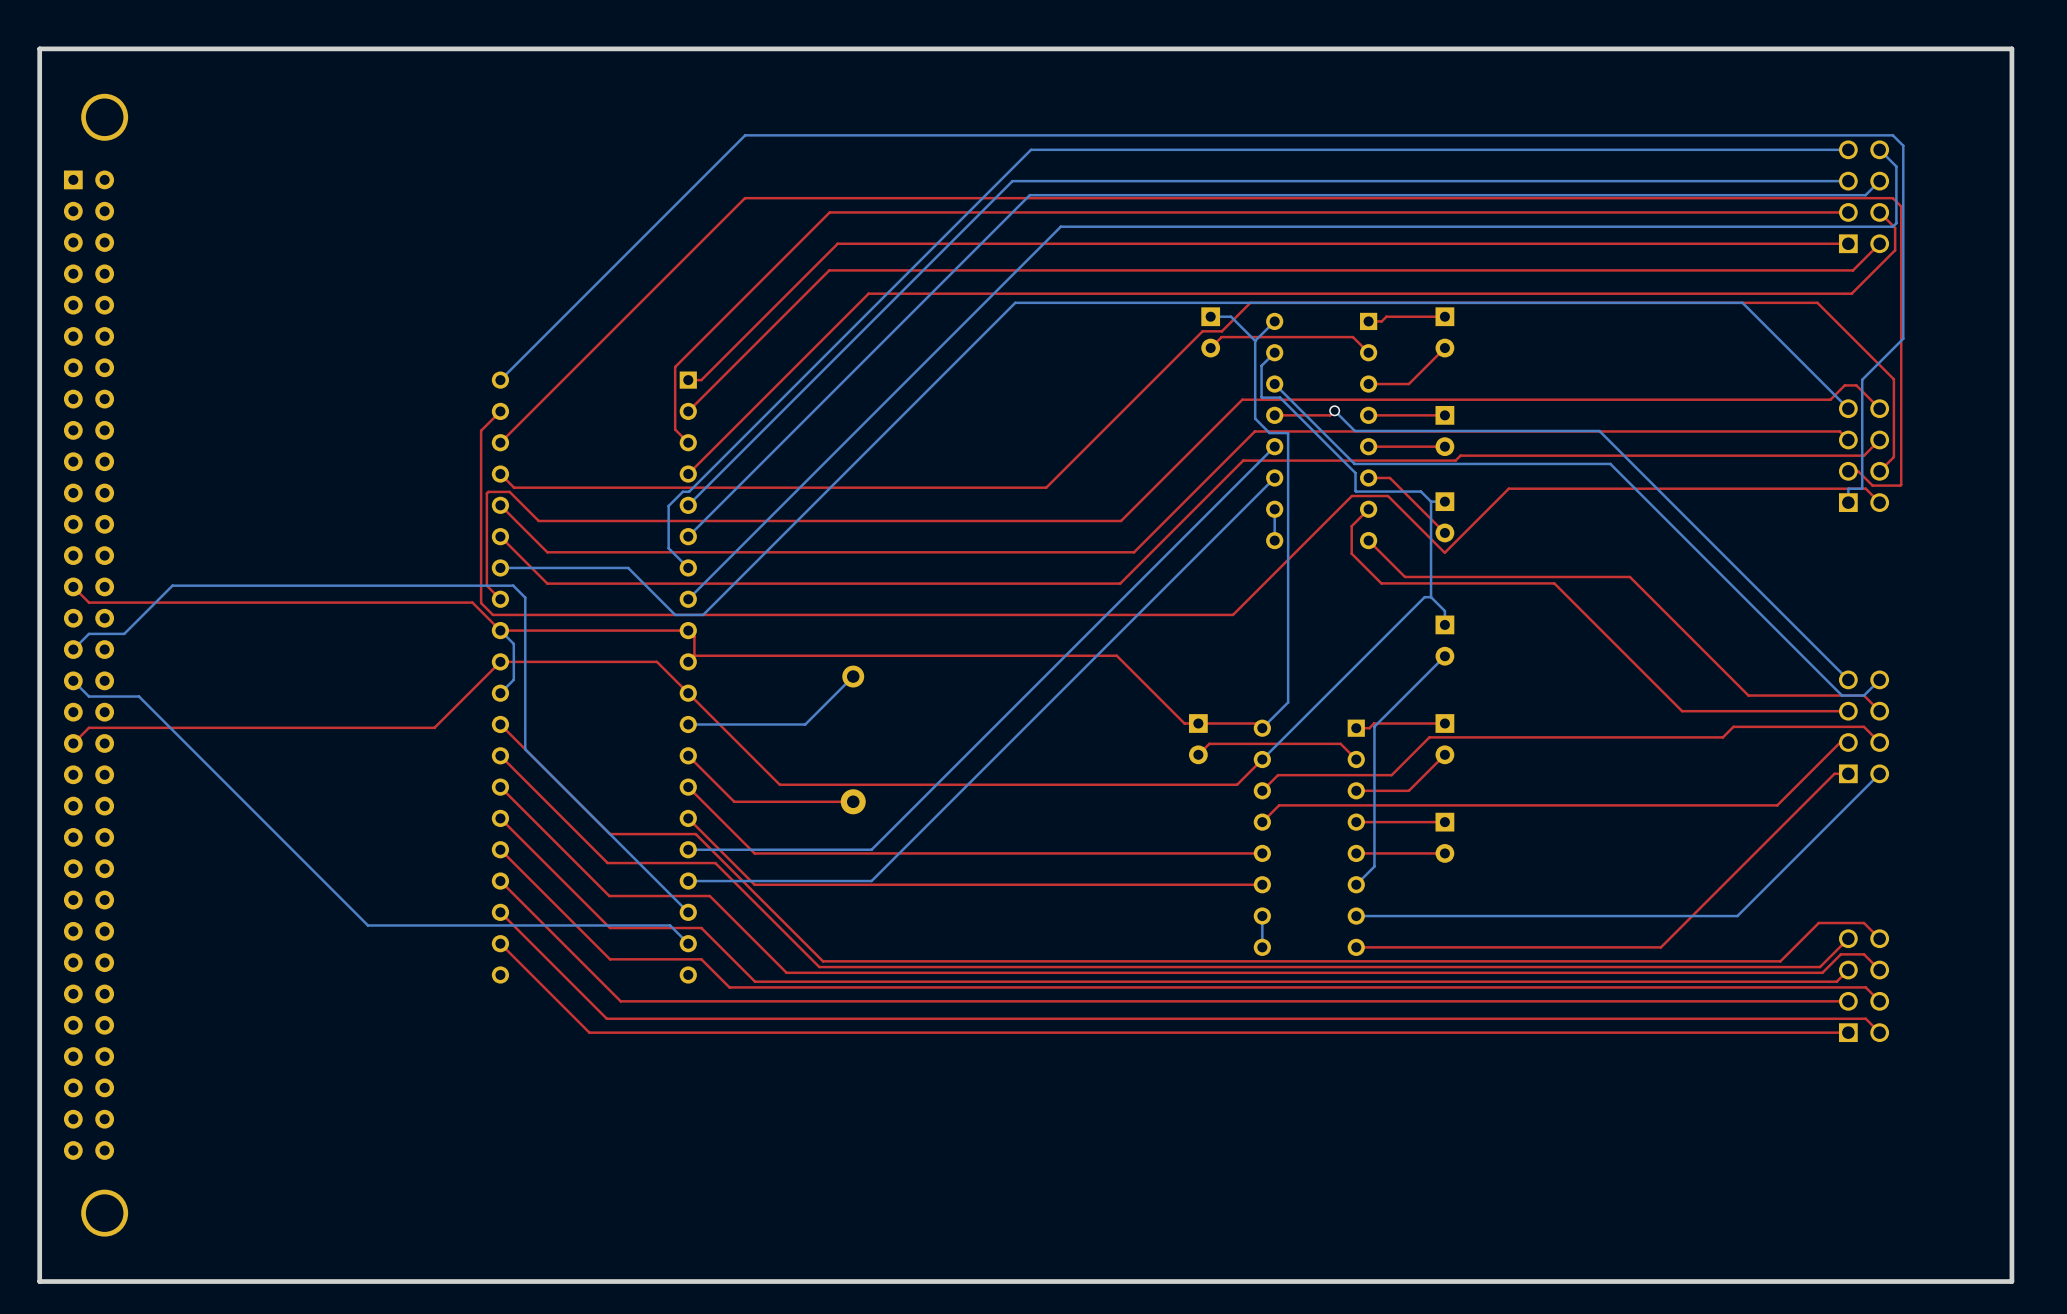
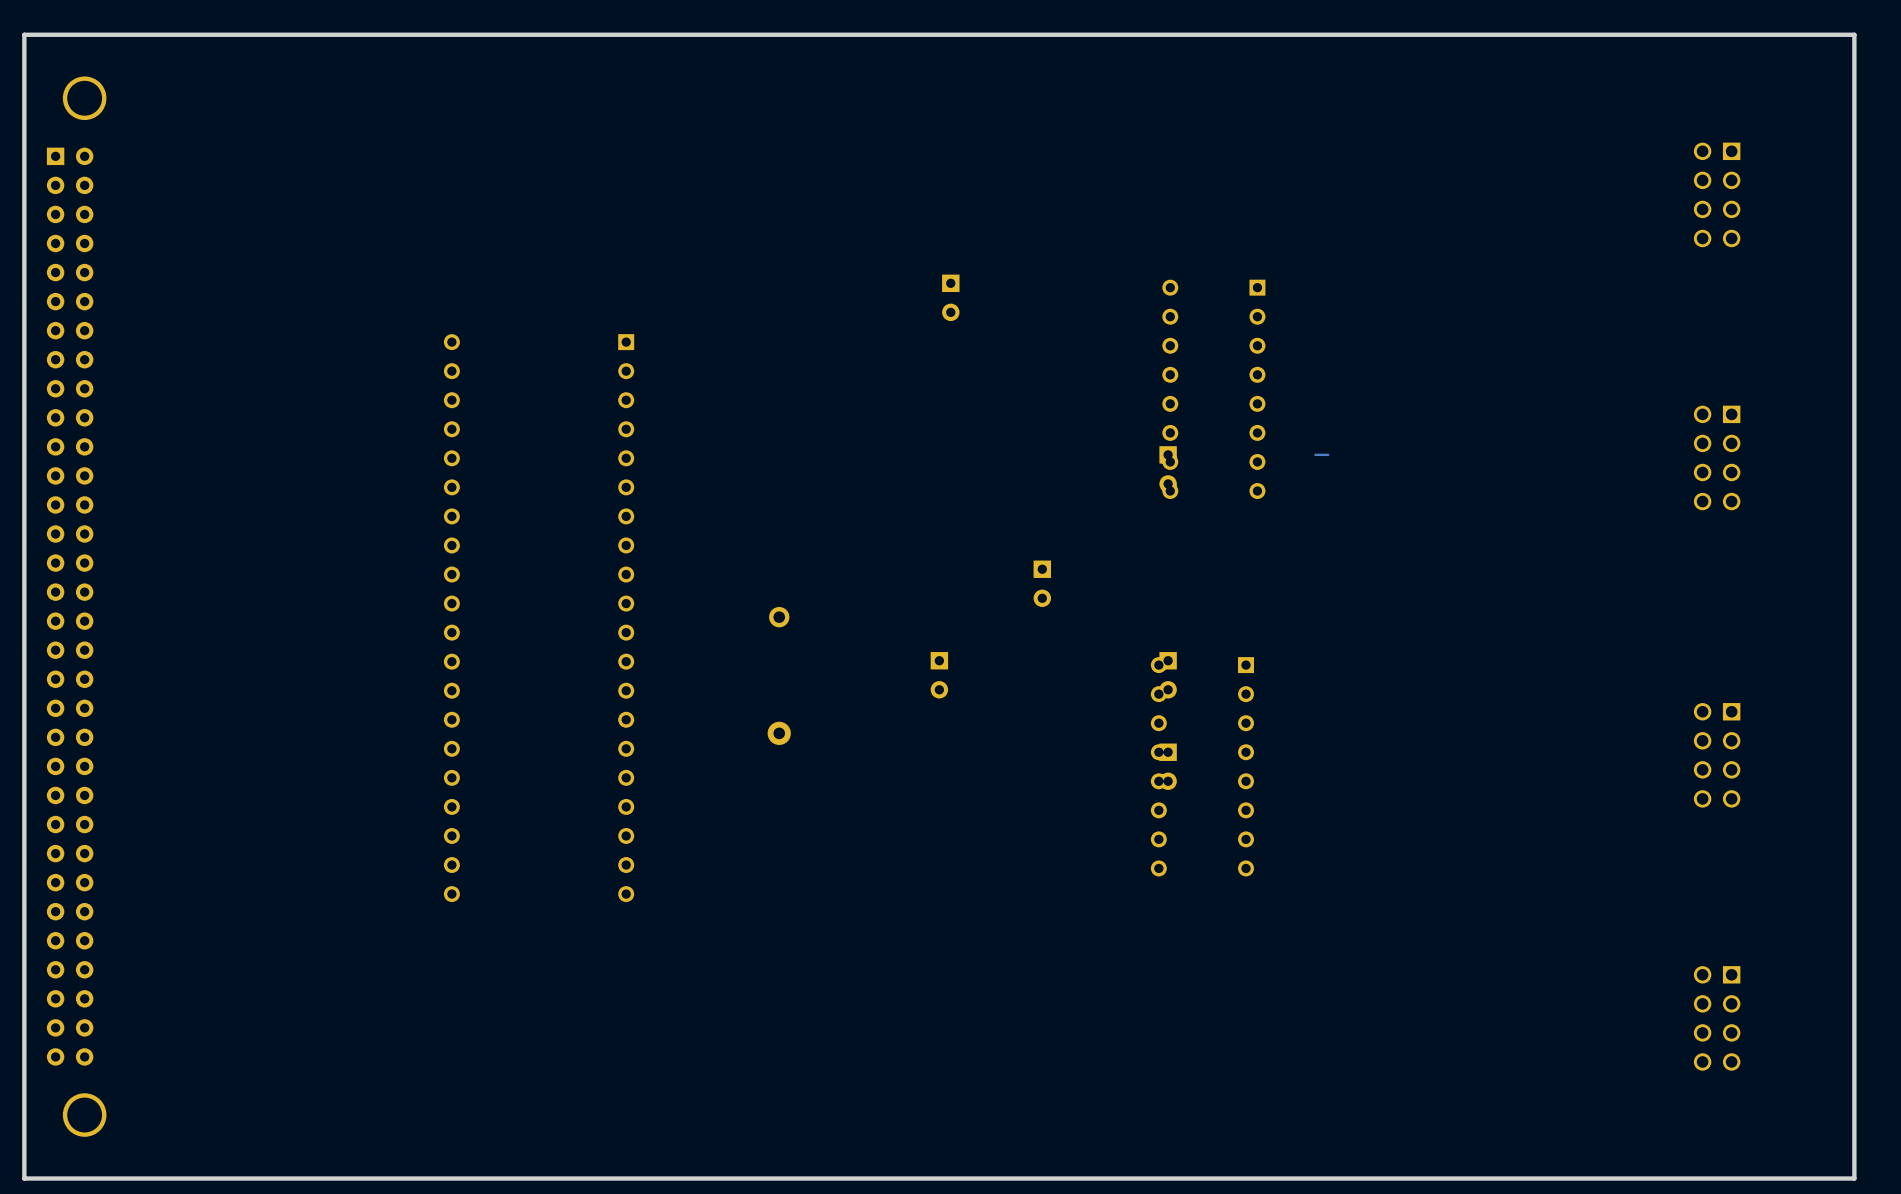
bottom track: (1848, 149) (1031, 149) (689, 491) (682, 491) (668, 506) (668, 548) (688, 567) -> none
bottom track: (1879, 149) (1896, 166) (1896, 223) (1892, 226) (1060, 226) (688, 599) -> none
bottom track: (1848, 181) (1012, 181) (688, 505) -> none
bottom track: (1879, 181) (1865, 195) (1029, 195) (688, 536) -> none
part rotation: 0° (1864, 196) -> 180° (1717, 194)
top track: (1848, 212) (829, 212) (675, 366) (675, 429) (688, 442) -> none
top track: (1879, 212) (1895, 227) (1895, 250) (1851, 293) (868, 293) (688, 474) -> none
top track: (1848, 243) (837, 243) (701, 380) (688, 380) -> none
top track: (1879, 243) (1853, 270) (829, 270) (688, 411) -> none
bottom track: (1210, 316) (1231, 316) (1255, 340) -> none
top track: (1444, 316) (1386, 316) (1381, 321) (1368, 321) -> none
bottom track: (1274, 321) (1255, 340) -> none
part: none -> (950, 297)
part: (1210, 332) -> none
part: (1444, 332) -> none
bottom track: (1255, 340) (1255, 418) (1269, 433) (1288, 433) (1288, 702) (1262, 728) -> none
top track: (1210, 348) (1221, 337) (1352, 337) (1368, 352) -> none
top track: (1444, 348) (1408, 384) (1368, 384) -> none
bottom track: (1274, 352) (1261, 365) (1261, 396) (1280, 397) (1355, 473) (1356, 491) (1420, 491) (1431, 501) (1431, 597) -> none
bottom track: (500, 380) (745, 135) (1892, 135) (1903, 145) (1903, 338) (1862, 379) (1862, 488) (1848, 488) (1848, 502) -> none
bottom track: (1274, 384) (1354, 463) (1610, 463) (1842, 695) (1864, 695) (1879, 679) -> none
bottom track: (1848, 408) (1742, 302) (1015, 302) (703, 614) (675, 614) (628, 567) (500, 567) -> none
top track: (1879, 408) (1856, 385) (1844, 385) (1830, 399) (1242, 399) (1121, 520) (538, 520) (509, 491) (488, 491) (486, 585) (500, 599) -> none
top track: (1334, 410) (1330, 415) (1274, 415) -> none
bottom track: (1334, 410) (1354, 431) (1599, 431) (1848, 679) -> none
via: (1334, 410) -> none
top track: (500, 411) (481, 430) (481, 603) (492, 614) (1233, 614) (1351, 496) (1387, 496) (1444, 552) (1508, 488) (1865, 488) (1879, 502) -> none
top track: (1444, 415) (1368, 415) -> none
part: (1444, 431) -> none
top track: (1848, 440) (1839, 431) (1254, 431) (1134, 552) (547, 552) (500, 505) -> none
top track: (1879, 440) (1864, 455) (1460, 455) (1455, 460) (1243, 460) (1120, 583) (547, 583) (500, 536) -> none
top track: (500, 442) (744, 198) (1892, 198) (1901, 206) (1901, 484) (1872, 485) (1858, 471) (1848, 471) -> none
bottom track: (1274, 446) (871, 849) (688, 849) -> none
top track: (1444, 446) (1368, 446) -> none
part rotation: 0° (1864, 455) -> 180° (1717, 457)
top track: (1879, 471) (1893, 457) (1893, 379) (1817, 302) (1250, 302) (1221, 331) (1202, 331) (1046, 487) (514, 487) (500, 474) -> none
bottom track: (1274, 477) (871, 881) (688, 881) -> none
top track: (1368, 477) (1389, 477) (1444, 532) -> none
bottom track: (1274, 509) (1274, 540) -> none
top track: (1368, 509) (1351, 526) (1351, 553) (1381, 583) (1554, 583) (1682, 711) (1848, 711) -> none
part: none -> (1168, 469)
part: (1444, 517) -> none
top track: (1368, 540) (1404, 576) (1629, 576) (1748, 695) (1864, 695) (1879, 711) -> none
top track: (73, 586) (89, 602) (472, 602) (500, 630) (688, 630) (694, 636) (694, 655) -> none
bottom track: (1431, 597) (1444, 611) (1444, 624) -> none
bottom track: (1431, 597) (1424, 597) (1262, 759) -> none
bottom track: (500, 630) (513, 643) (513, 679) (500, 693) -> none
part: none -> (1042, 583)
part: (1444, 640) -> none
bottom track: (73, 649) (89, 633) (124, 633) (172, 585) (513, 585) (525, 597) (525, 749) (688, 912) -> none
top track: (694, 655) (1116, 655) (1184, 723) (1257, 723) (1262, 728) -> none
bottom track: (1444, 656) (1374, 726) (1374, 866) (1356, 884) -> none
bottom track: (853, 676) (805, 724) (688, 724) -> none
bottom track: (73, 680) (89, 696) (139, 696) (367, 925) (670, 925) (688, 943) -> none
top track: (1444, 723) (1374, 723) (1369, 728) (1356, 728) -> none
top track: (500, 724) (610, 834) (695, 834) (823, 961) (1780, 961) (1818, 923) (1863, 923) (1879, 938) -> none
part: (1864, 726) -> none
part: none -> (939, 675)
part: (1198, 739) -> none
part: none -> (1168, 675)
part: (1444, 739) -> none
top track: (1848, 742) (1840, 742) (1777, 805) (1279, 805) (1262, 822) -> none
top track: (1879, 742) (1864, 726) (1733, 726) (1722, 737) (1429, 737) (1391, 775) (1278, 775) (1262, 790) -> none
top track: (73, 743) (89, 727) (434, 727) (500, 661) (656, 661) (779, 784) (1237, 784) (1262, 759) -> none
top track: (1198, 754) (1209, 743) (1340, 743) (1356, 759) -> none
top track: (1444, 754) (1408, 790) (1356, 790) -> none
top track: (500, 755) (607, 863) (715, 863) (819, 967) (1820, 967) (1848, 938) -> none
top track: (688, 755) (734, 801) (853, 801) -> none
top track: (1848, 773) (1834, 773) (1660, 947) (1356, 947) -> none
bottom track: (1879, 773) (1737, 916) (1356, 916) -> none
top track: (500, 787) (609, 896) (709, 896) (786, 972) (1822, 972) (1840, 954) (1864, 954) (1879, 970) -> none
top track: (688, 787) (754, 853) (1262, 853) -> none
top track: (500, 818) (610, 928) (701, 928) (755, 981) (1836, 981) (1848, 970) -> none
top track: (688, 818) (754, 884) (1262, 884) -> none
top track: (1444, 822) (1356, 822) -> none
part: none -> (1717, 755)
part: none -> (1168, 766)
part: (1444, 837) -> none
top track: (500, 849) (610, 959) (701, 959) (729, 987) (1865, 987) (1879, 1001) -> none
top track: (1444, 853) (1356, 853) -> none
top track: (500, 881) (620, 1001) (1848, 1001) -> none
top track: (500, 912) (606, 1018) (1865, 1018) (1879, 1032) -> none
bottom track: (1262, 916) (1262, 947) -> none
top track: (500, 943) (589, 1032) (1848, 1032) -> none
part: (1864, 985) -> none
part: none -> (1717, 1018)

